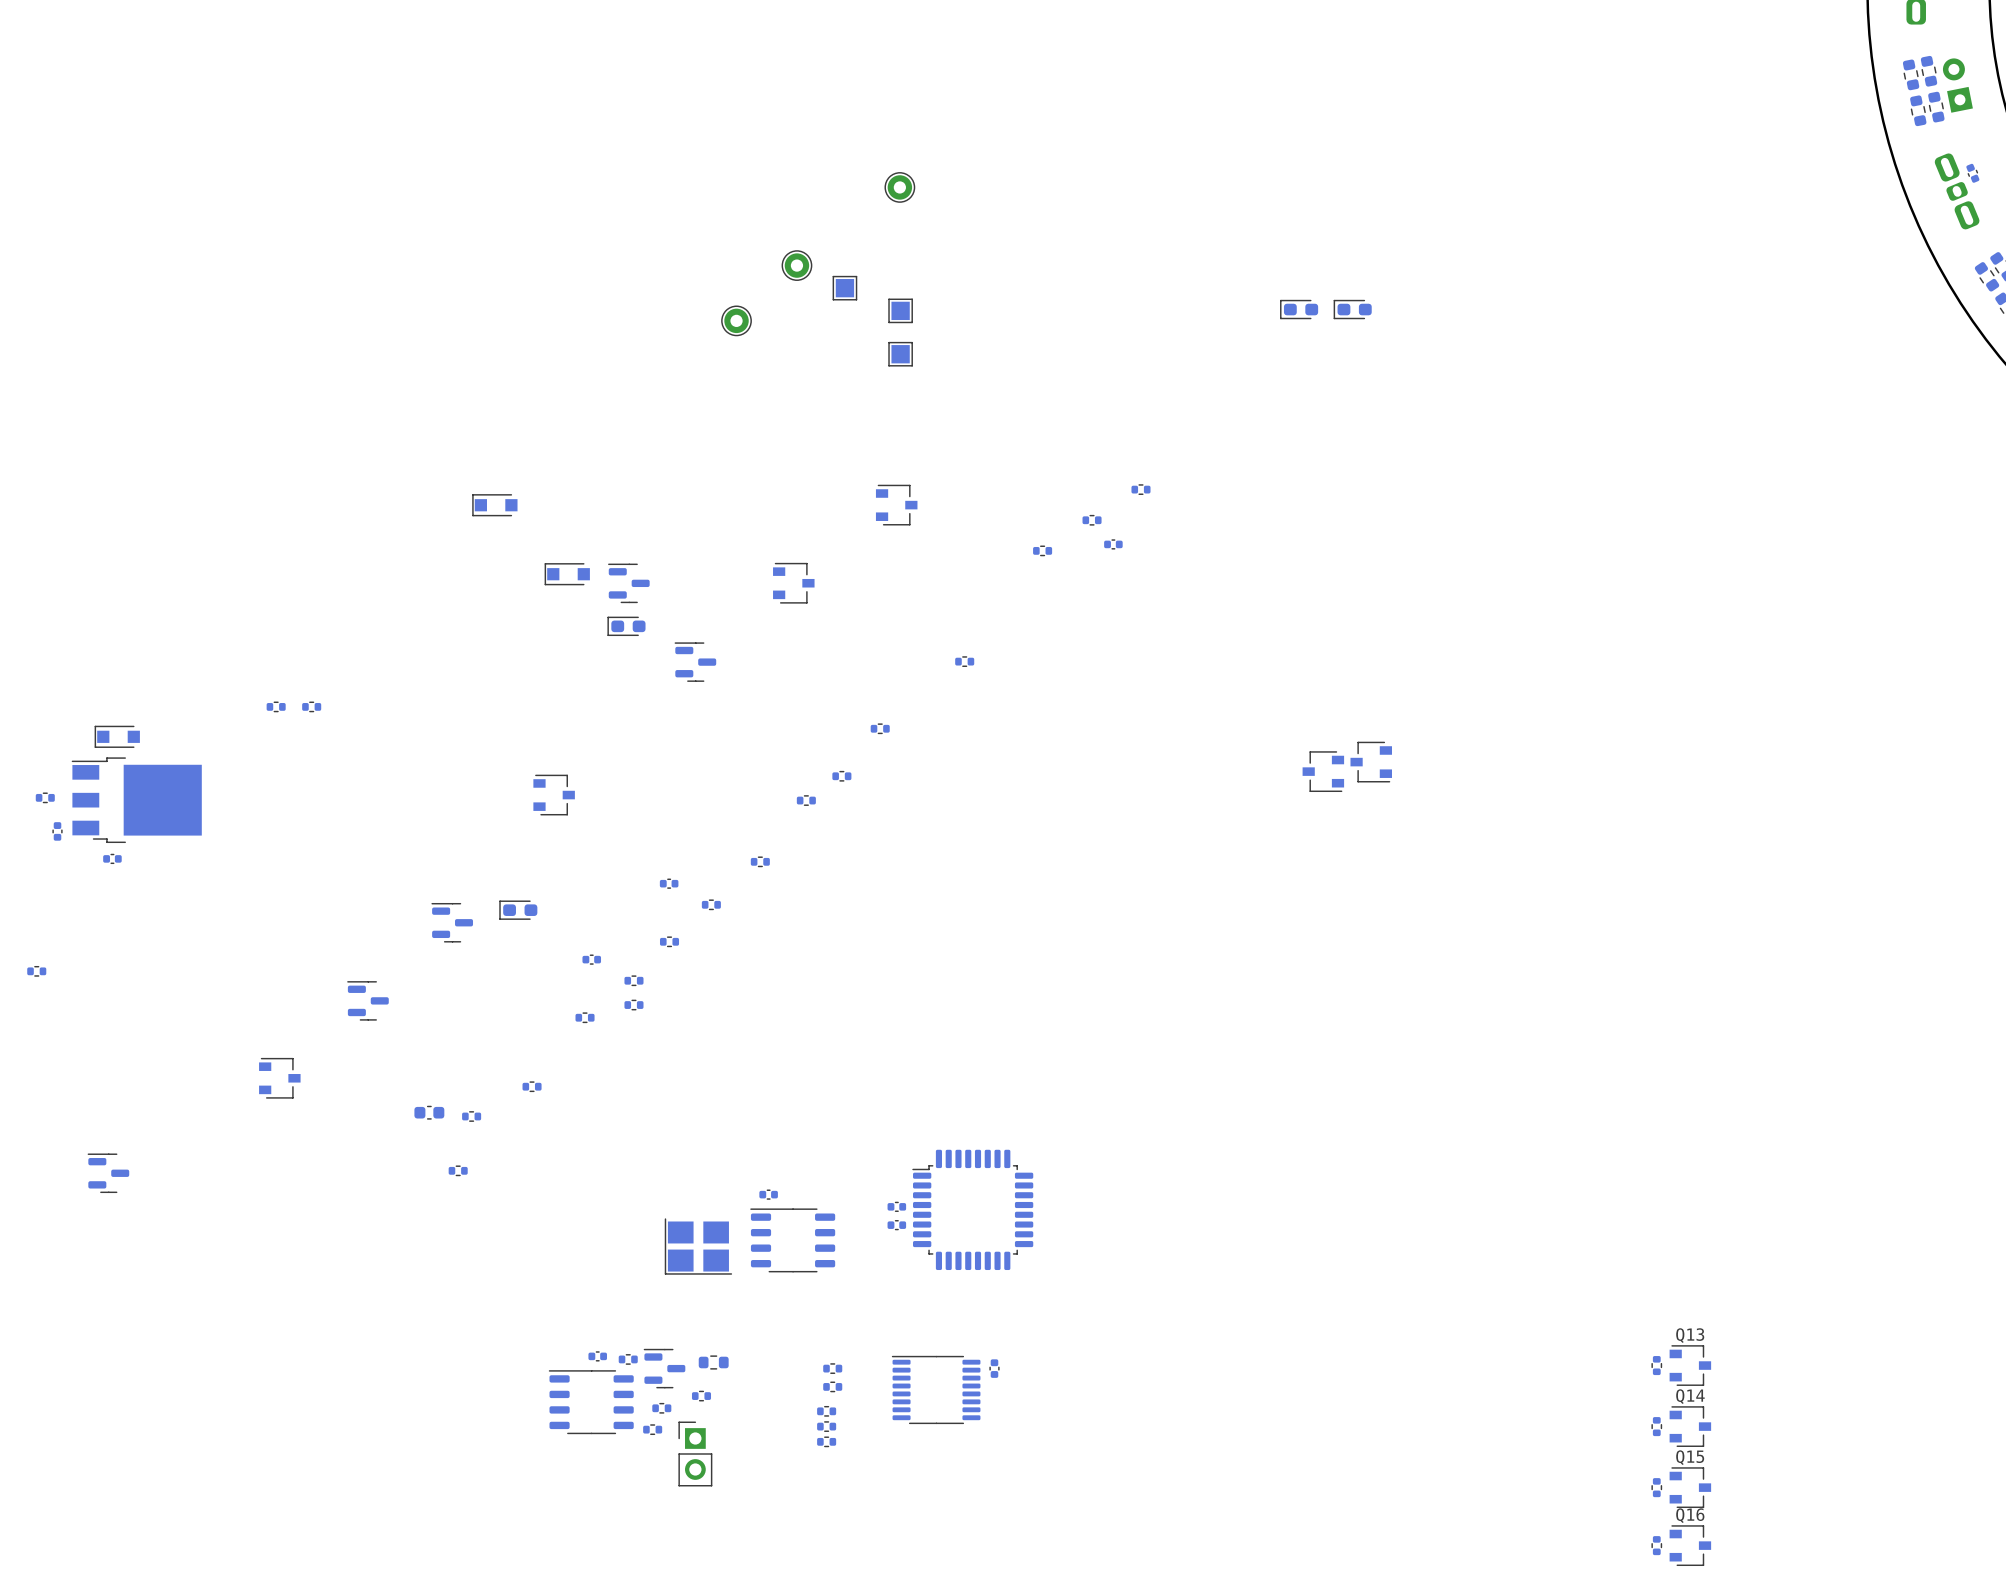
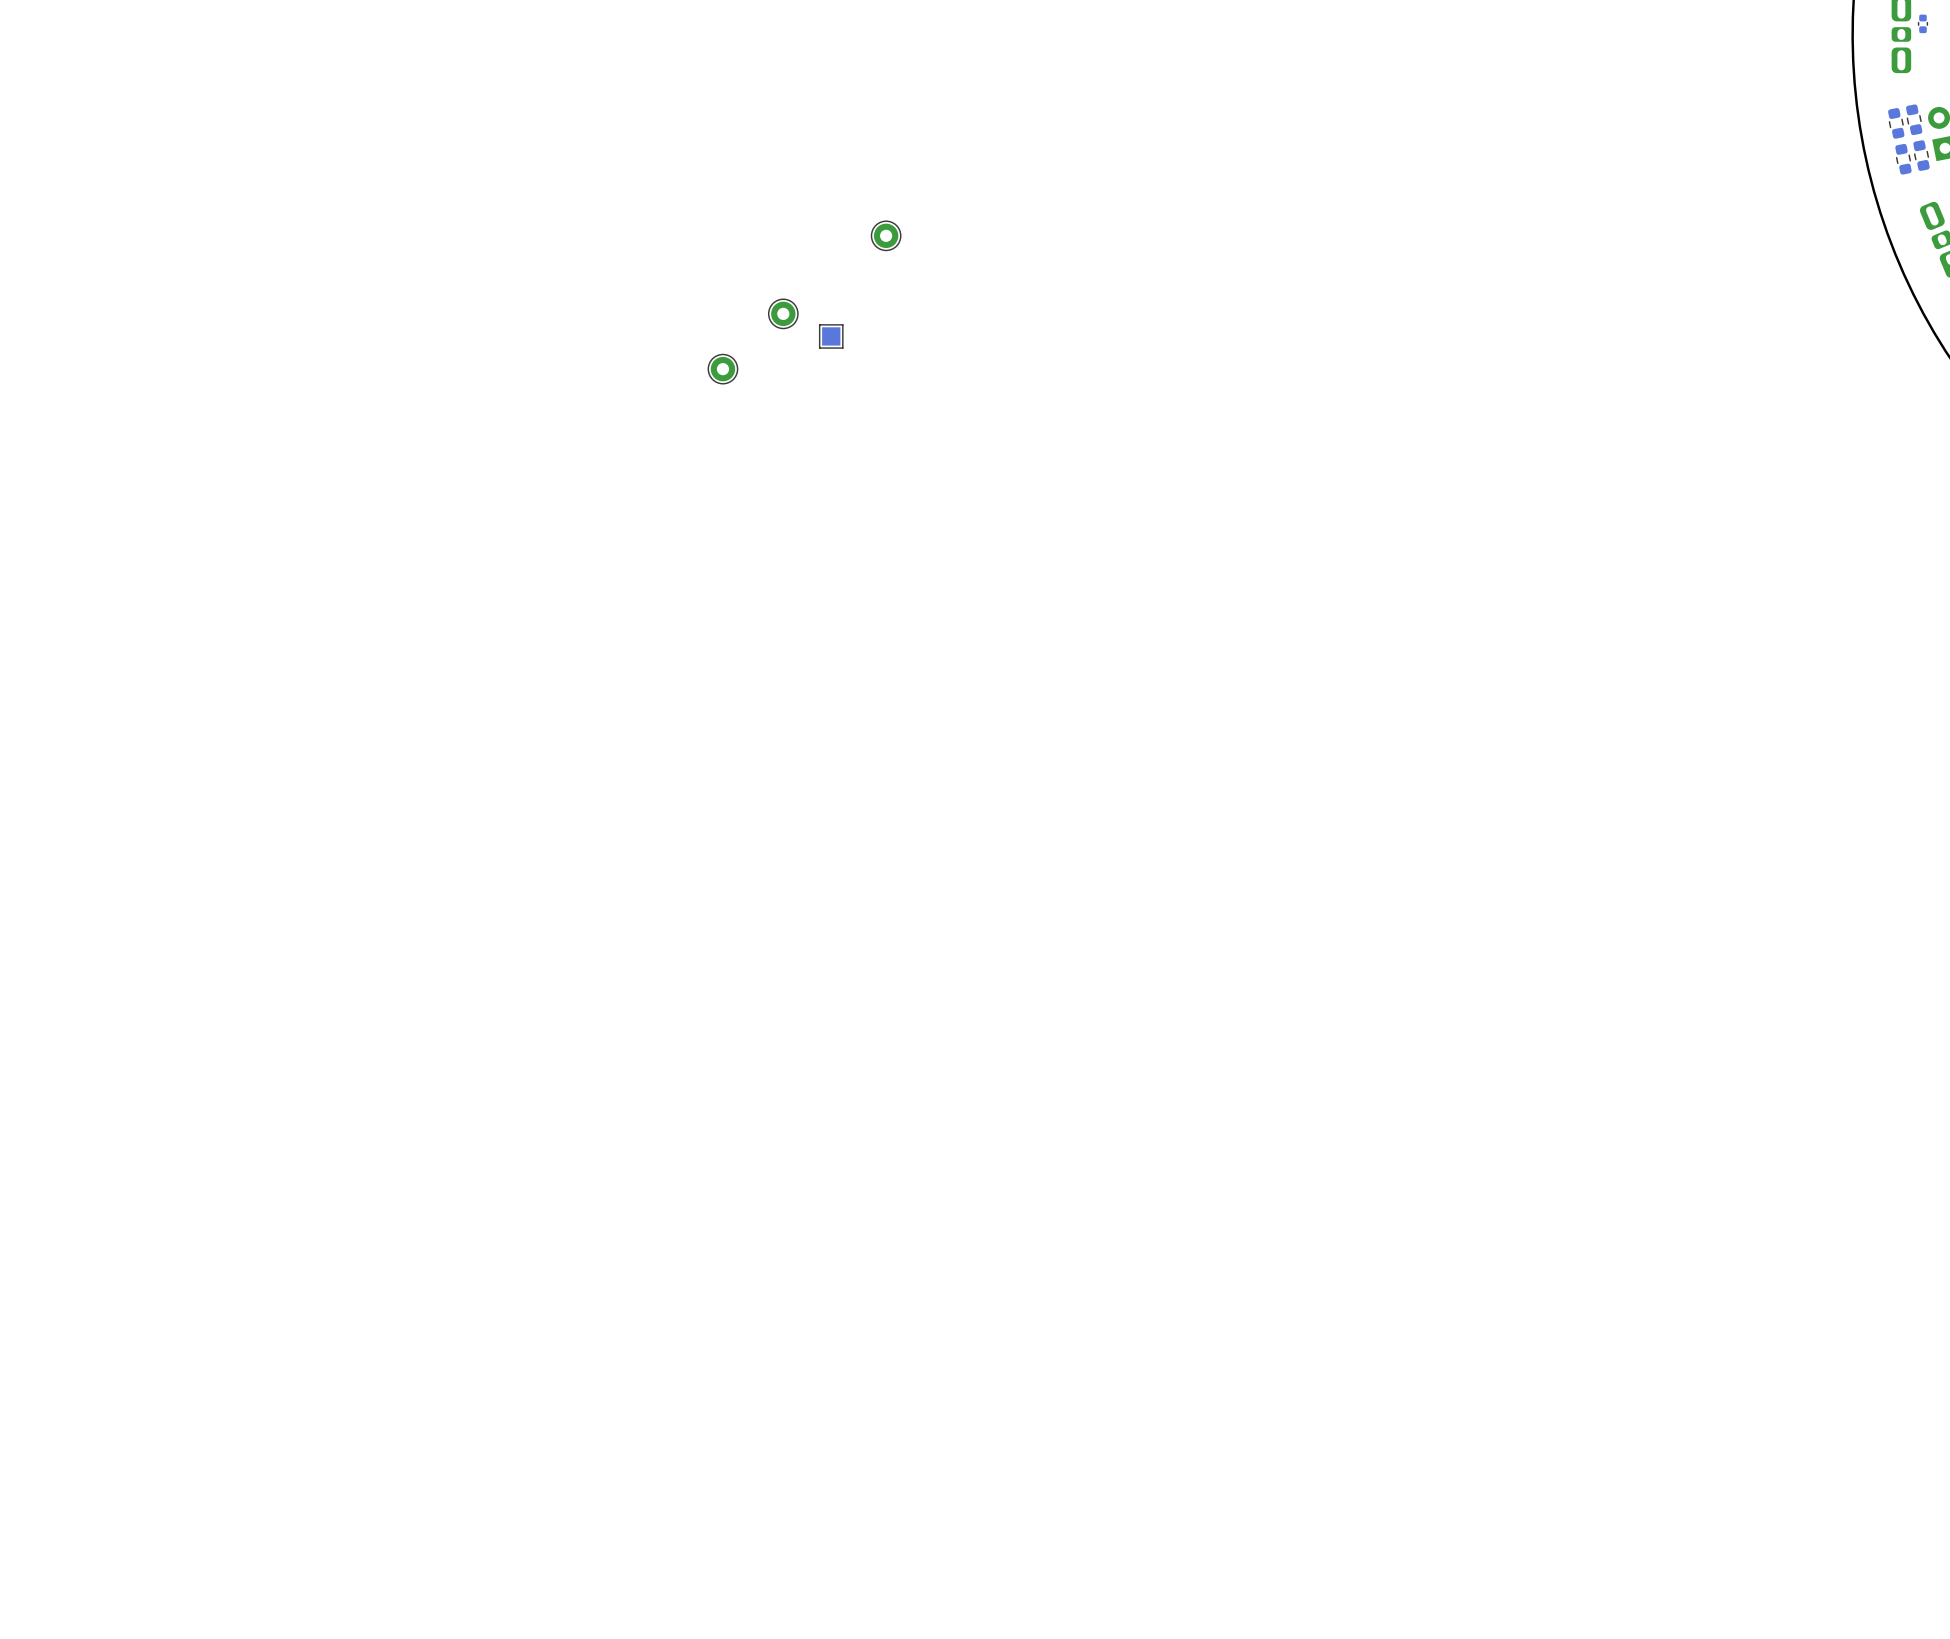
part: (1299, 309) -> none
part: (1352, 309) -> none
part: (900, 310) -> none
part: (900, 354) -> none
part: (1140, 489) -> none
part: (494, 505) -> none
part: (896, 505) -> none
part: (1092, 520) -> none
part: (1113, 544) -> none
part: (1042, 550) -> none
part: (567, 574) -> none
part: (628, 583) -> none
part: (793, 583) -> none
part: (626, 626) -> none
part: (964, 661) -> none
part: (695, 662) -> none
part: (276, 706) -> none
part: (311, 706) -> none
part: (880, 728) -> none
part: (117, 736) -> none
part: (1371, 762) -> none
part: (1323, 771) -> none
part: (841, 776) -> none
part: (554, 795) -> none
part: (45, 797) -> none
part: (136, 800) -> none
part: (806, 800) -> none
part: (57, 831) -> none
part: (112, 858) -> none
part: (760, 861) -> none
part: (669, 883) -> none
part: (711, 904) -> none
part: (518, 910) -> none
part: (452, 922) -> none
part: (669, 941) -> none
part: (591, 959) -> none
part: (36, 971) -> none
part: (633, 980) -> none
part: (367, 1000) -> none
part: (633, 1005) -> none
part: (585, 1017) -> none
part: (279, 1078) -> none
part: (532, 1086) -> none
part: (429, 1112) -> none
part: (471, 1116) -> none
part: (458, 1170) -> none
part: (108, 1173) -> none
part: (768, 1194) -> none
part: (896, 1206) -> none
part: (972, 1209) -> none
part: (896, 1225) -> none
part: (792, 1240) -> none
part: (698, 1246) -> none
part: (597, 1356) -> none
part: (628, 1359) -> none
part: (713, 1362) -> none
part: (1656, 1365) -> none
Q13: (1690, 1365) -> none
part: (664, 1368) -> none
part: (832, 1368) -> none
part: (994, 1368) -> none
part: (832, 1386) -> none
part: (936, 1389) -> none
part: (701, 1396) -> none
part: (591, 1402) -> none
part: (661, 1408) -> none
part: (826, 1411) -> none
part: (826, 1426) -> none
part: (1656, 1426) -> none
Q14: (1690, 1426) -> none
part: (652, 1429) -> none
part: (826, 1441) -> none
part: (695, 1453) -> none
part: (1656, 1487) -> none
Q15: (1690, 1487) -> none
part: (1656, 1545) -> none
Q16: (1690, 1545) -> none

